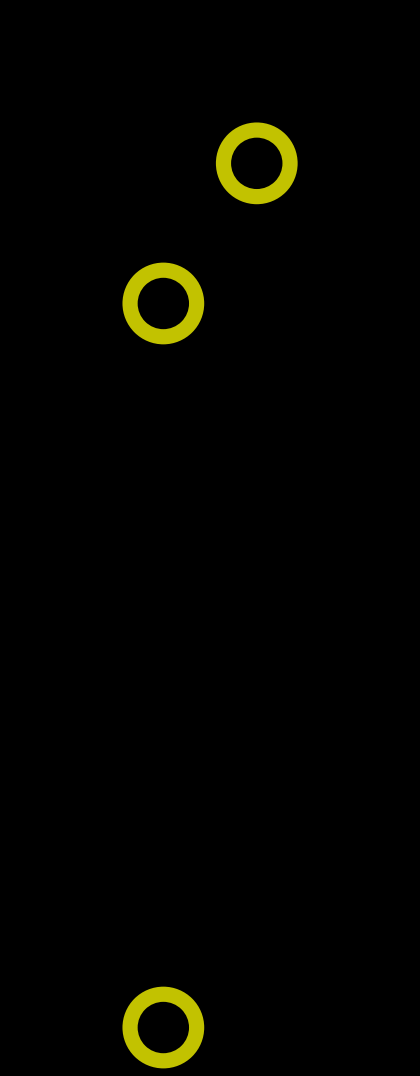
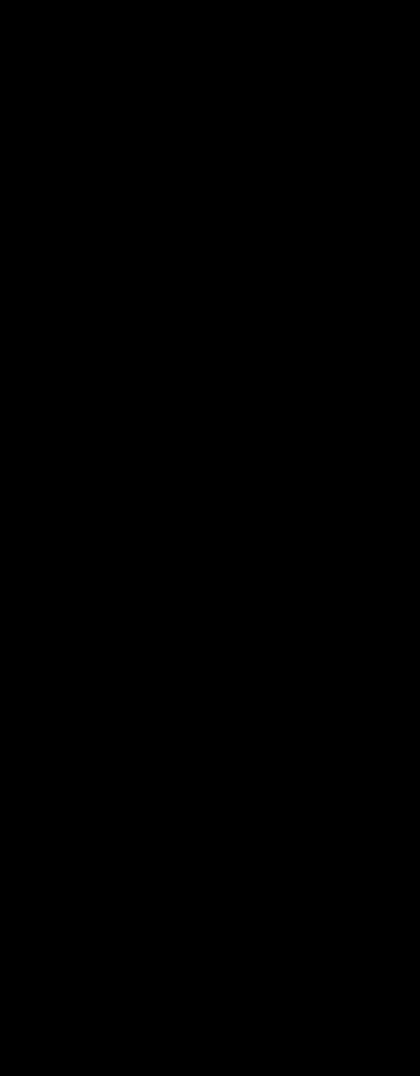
part: (256, 163) -> none
part: (163, 303) -> none
part: (163, 1027) -> none

